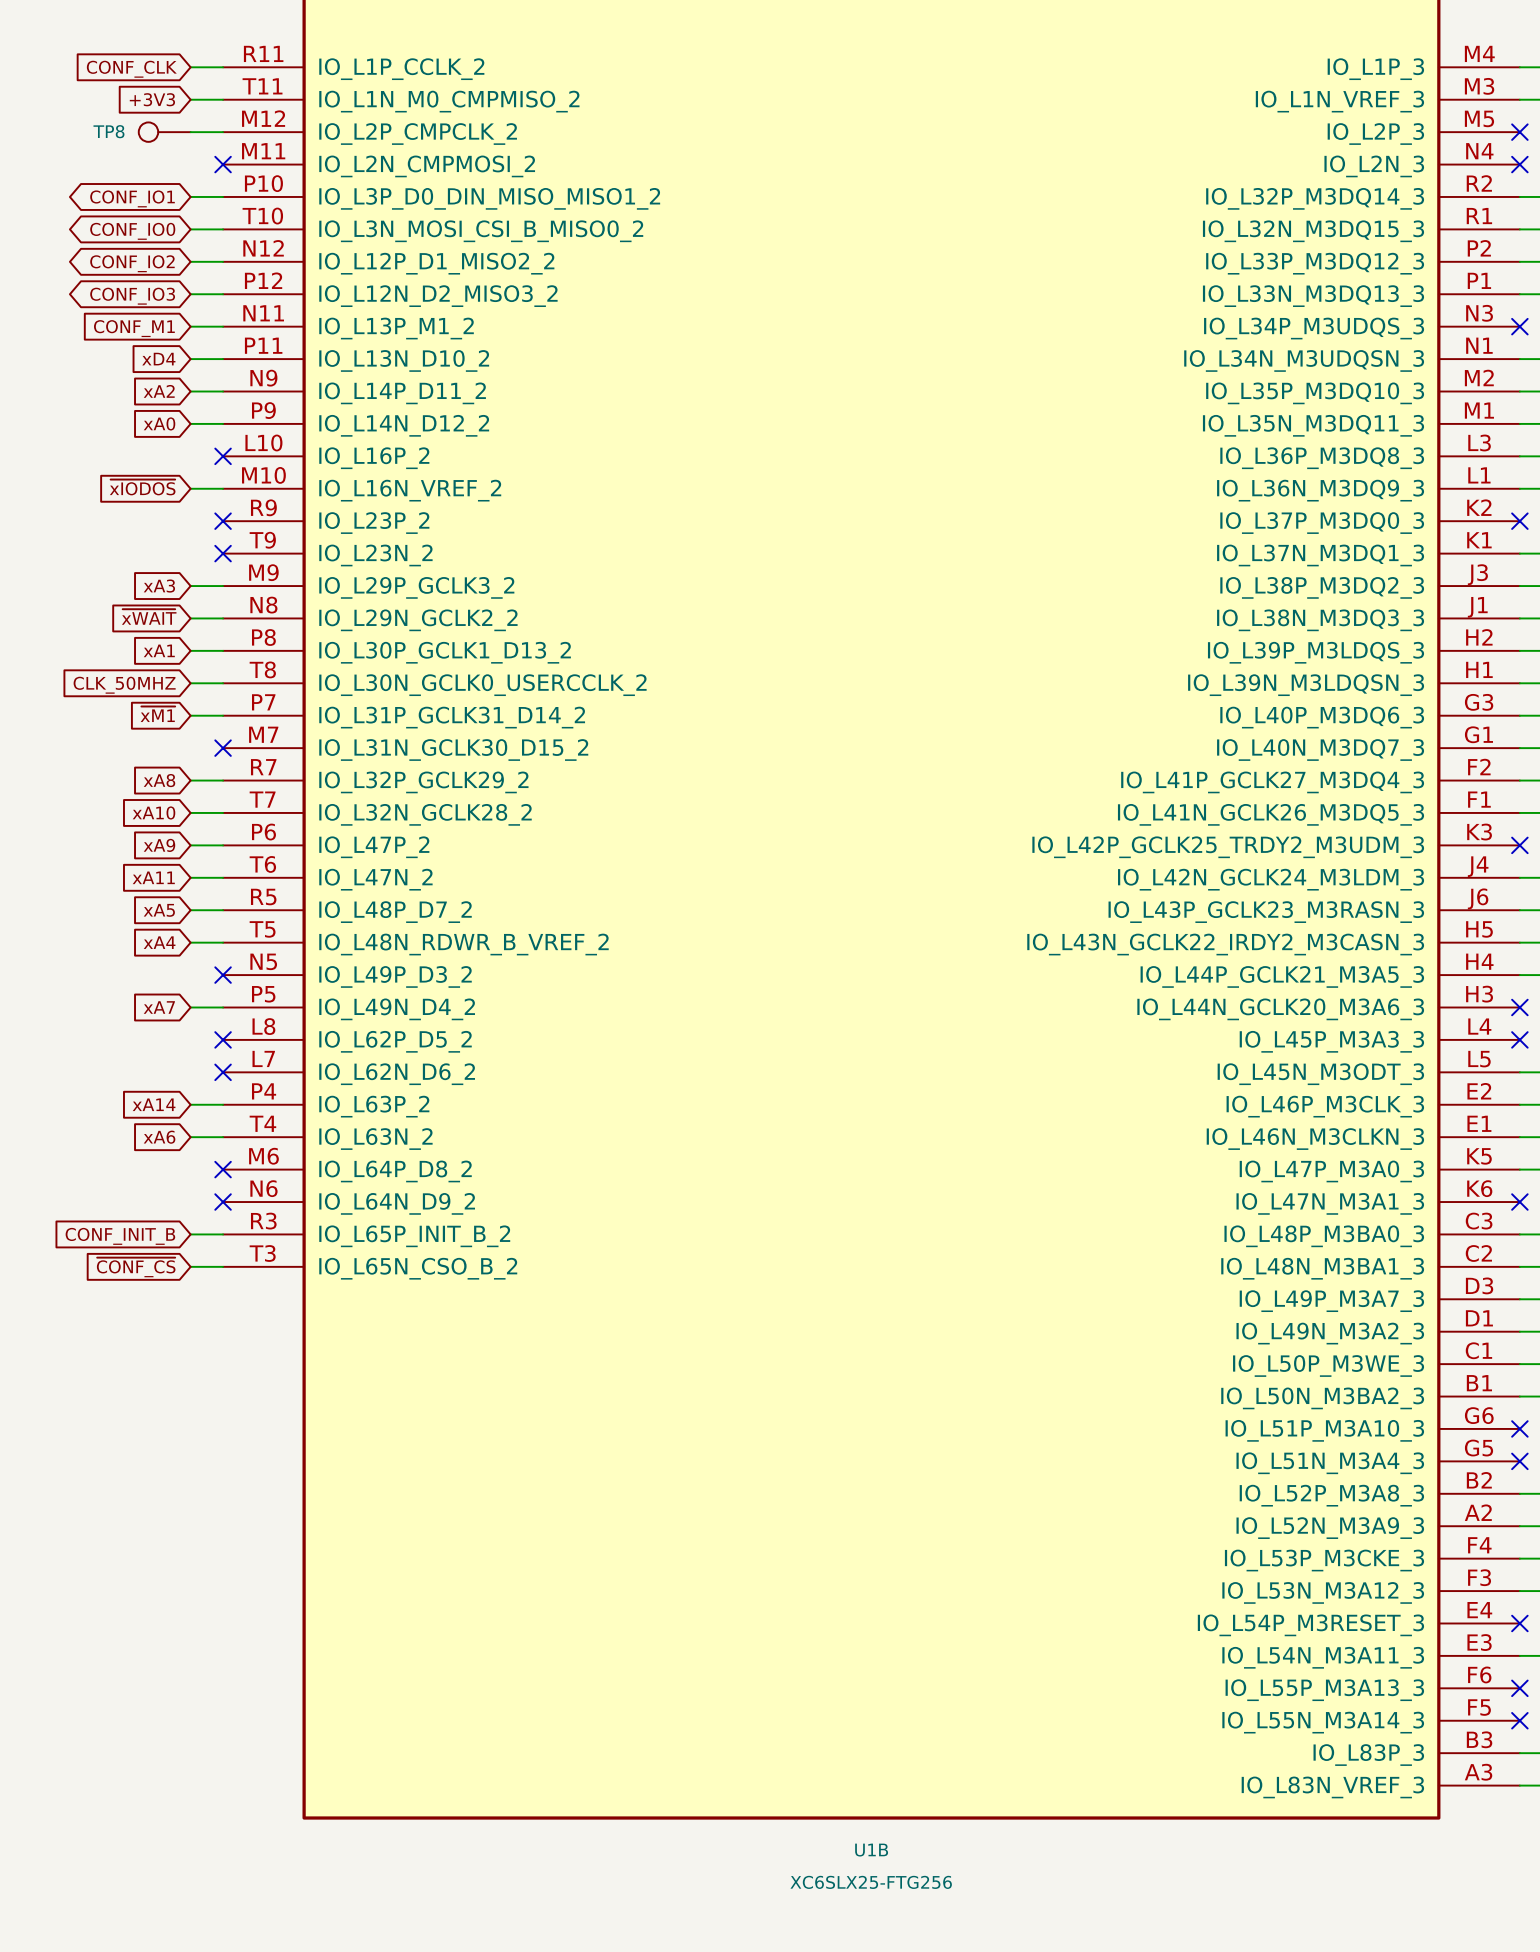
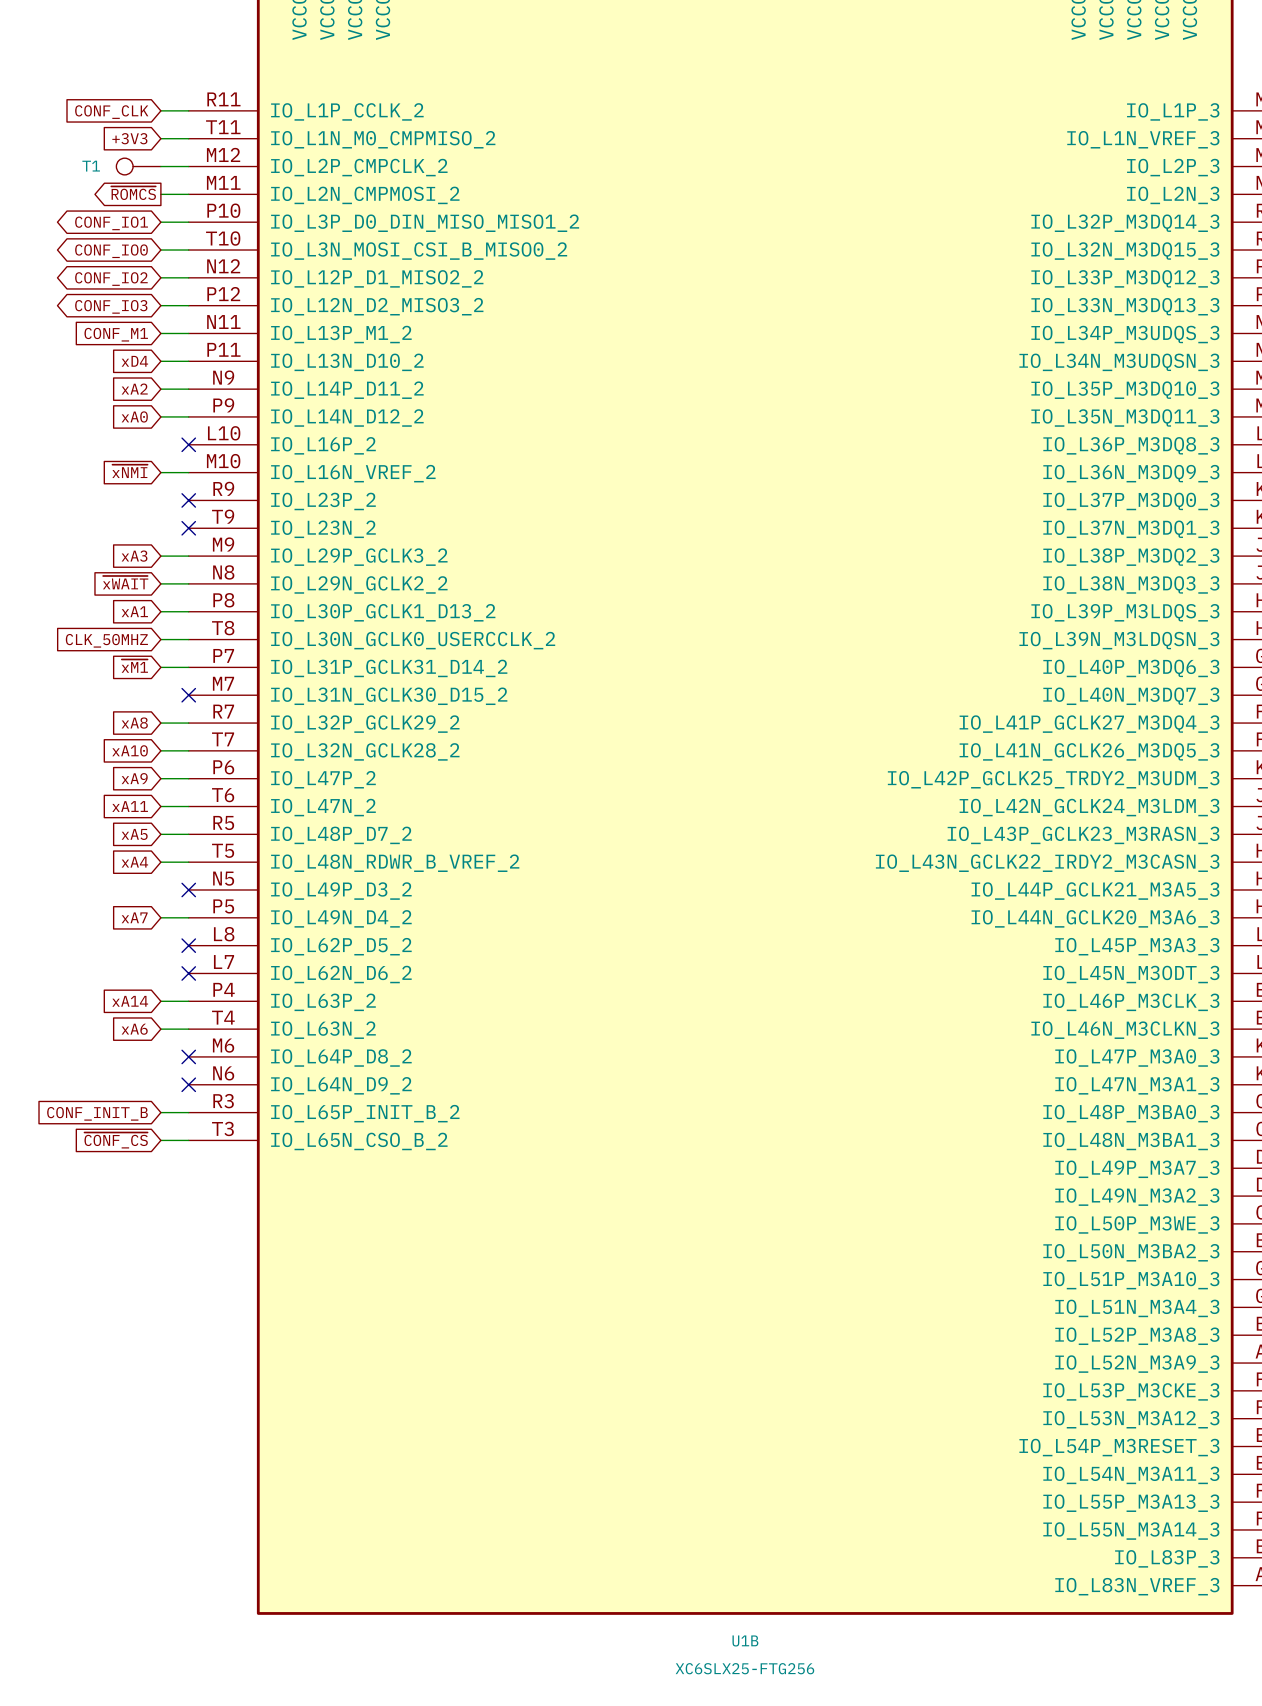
TP8 name: TP8 (108, 131) -> T1 (91, 166)
global label: none -> ~{ROMCS} (133, 193)
wire: none -> (160, 194) (188, 194)
no-connect mark: (223, 164) -> none
global label: ~{xIODOS} (142, 487) -> ~{xNMI} (129, 471)

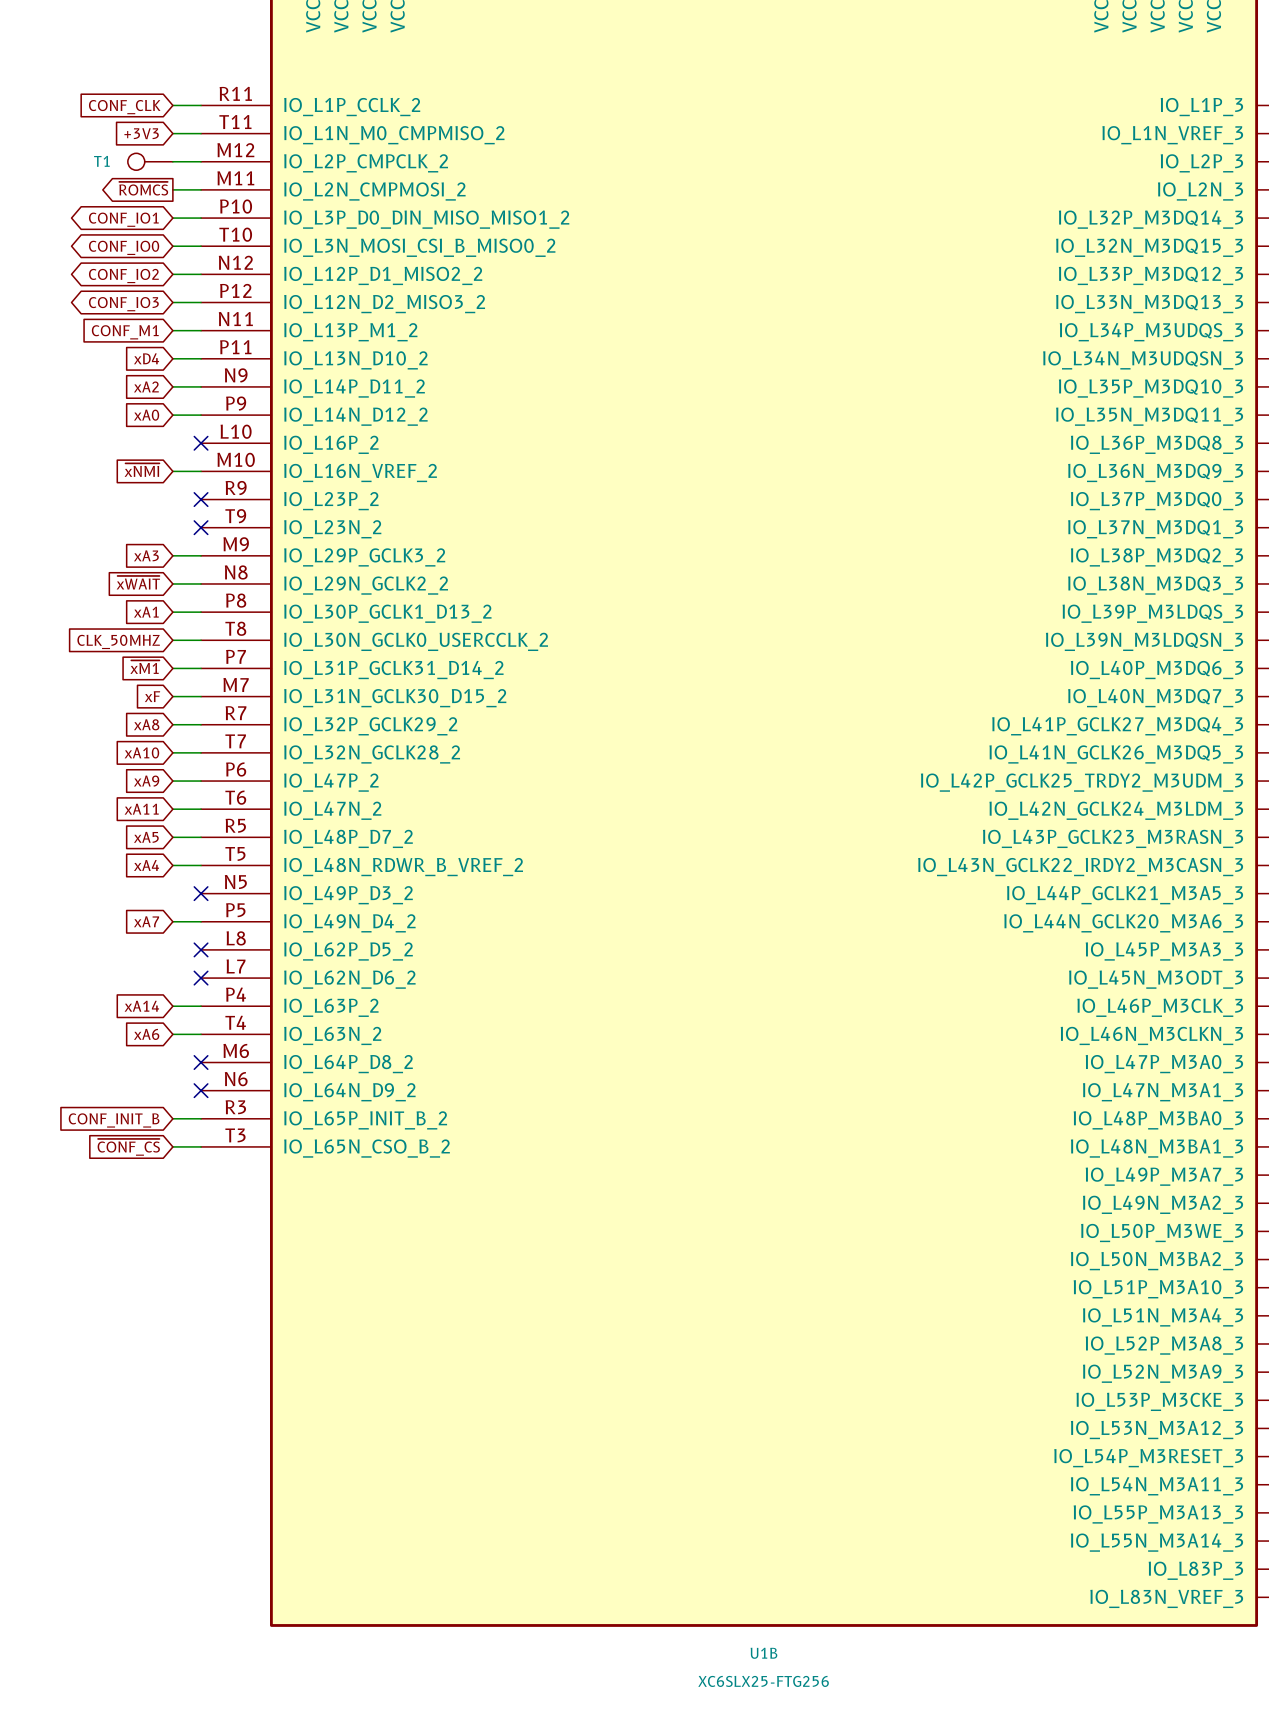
global label: none -> xF (152, 696)
wire: none -> (172, 696) (201, 696)
no-connect mark: (188, 695) -> none

